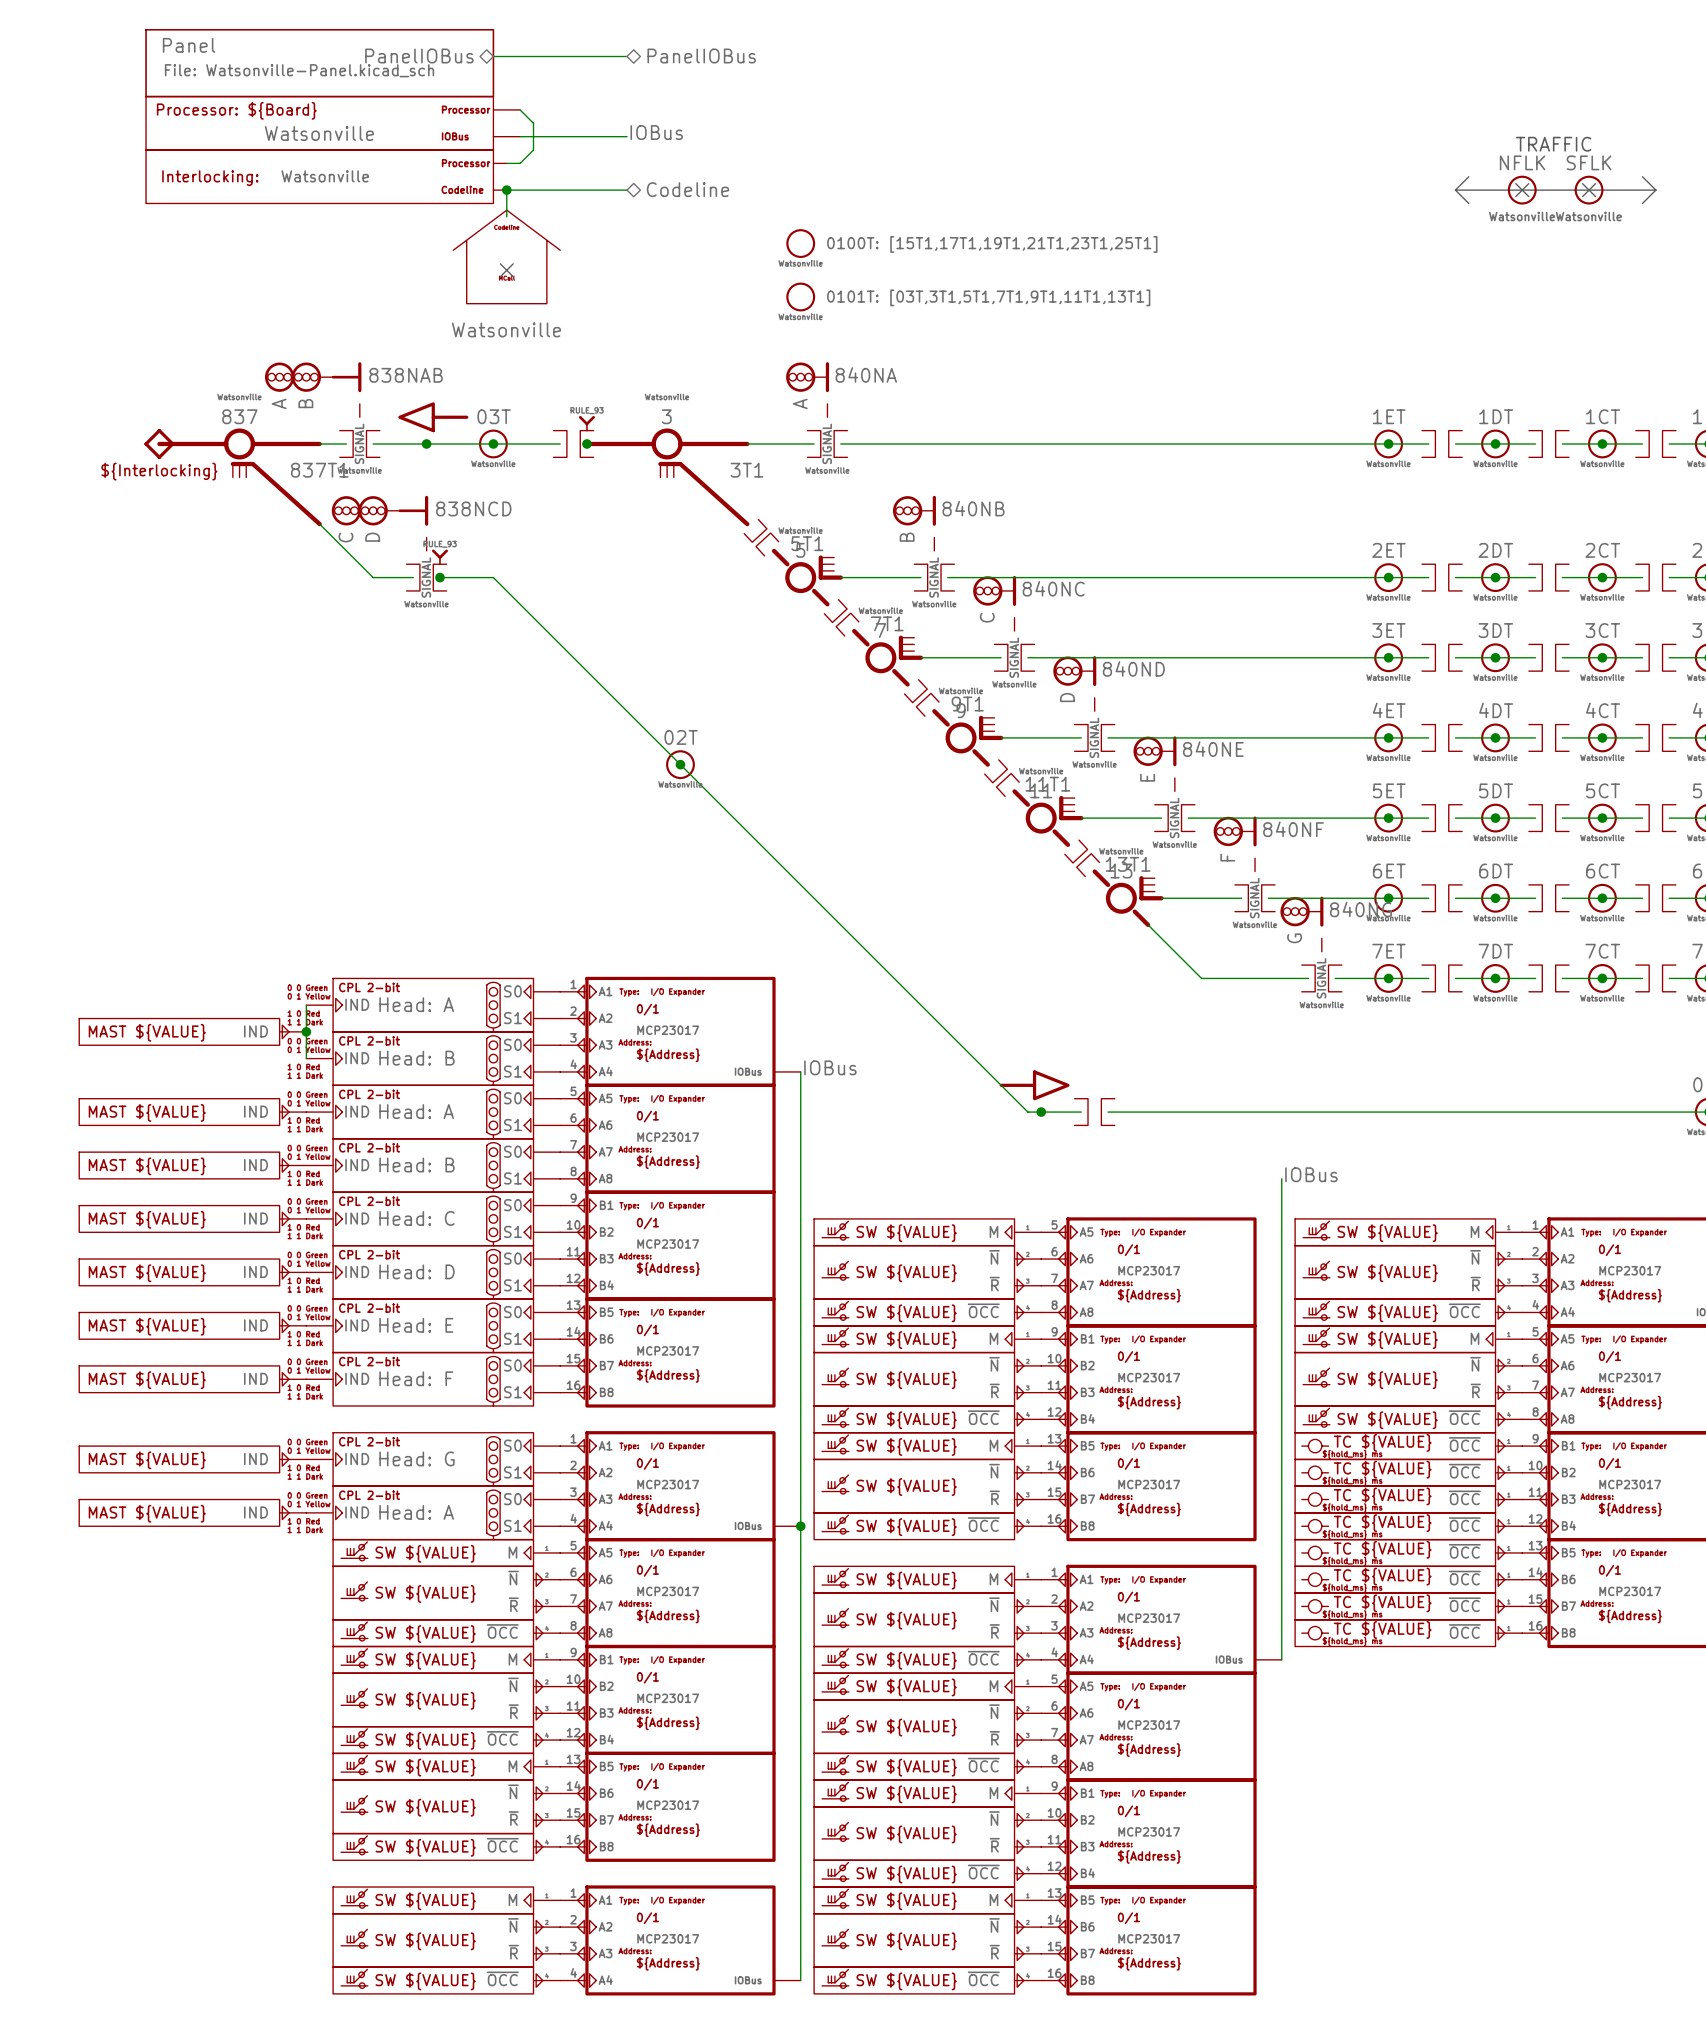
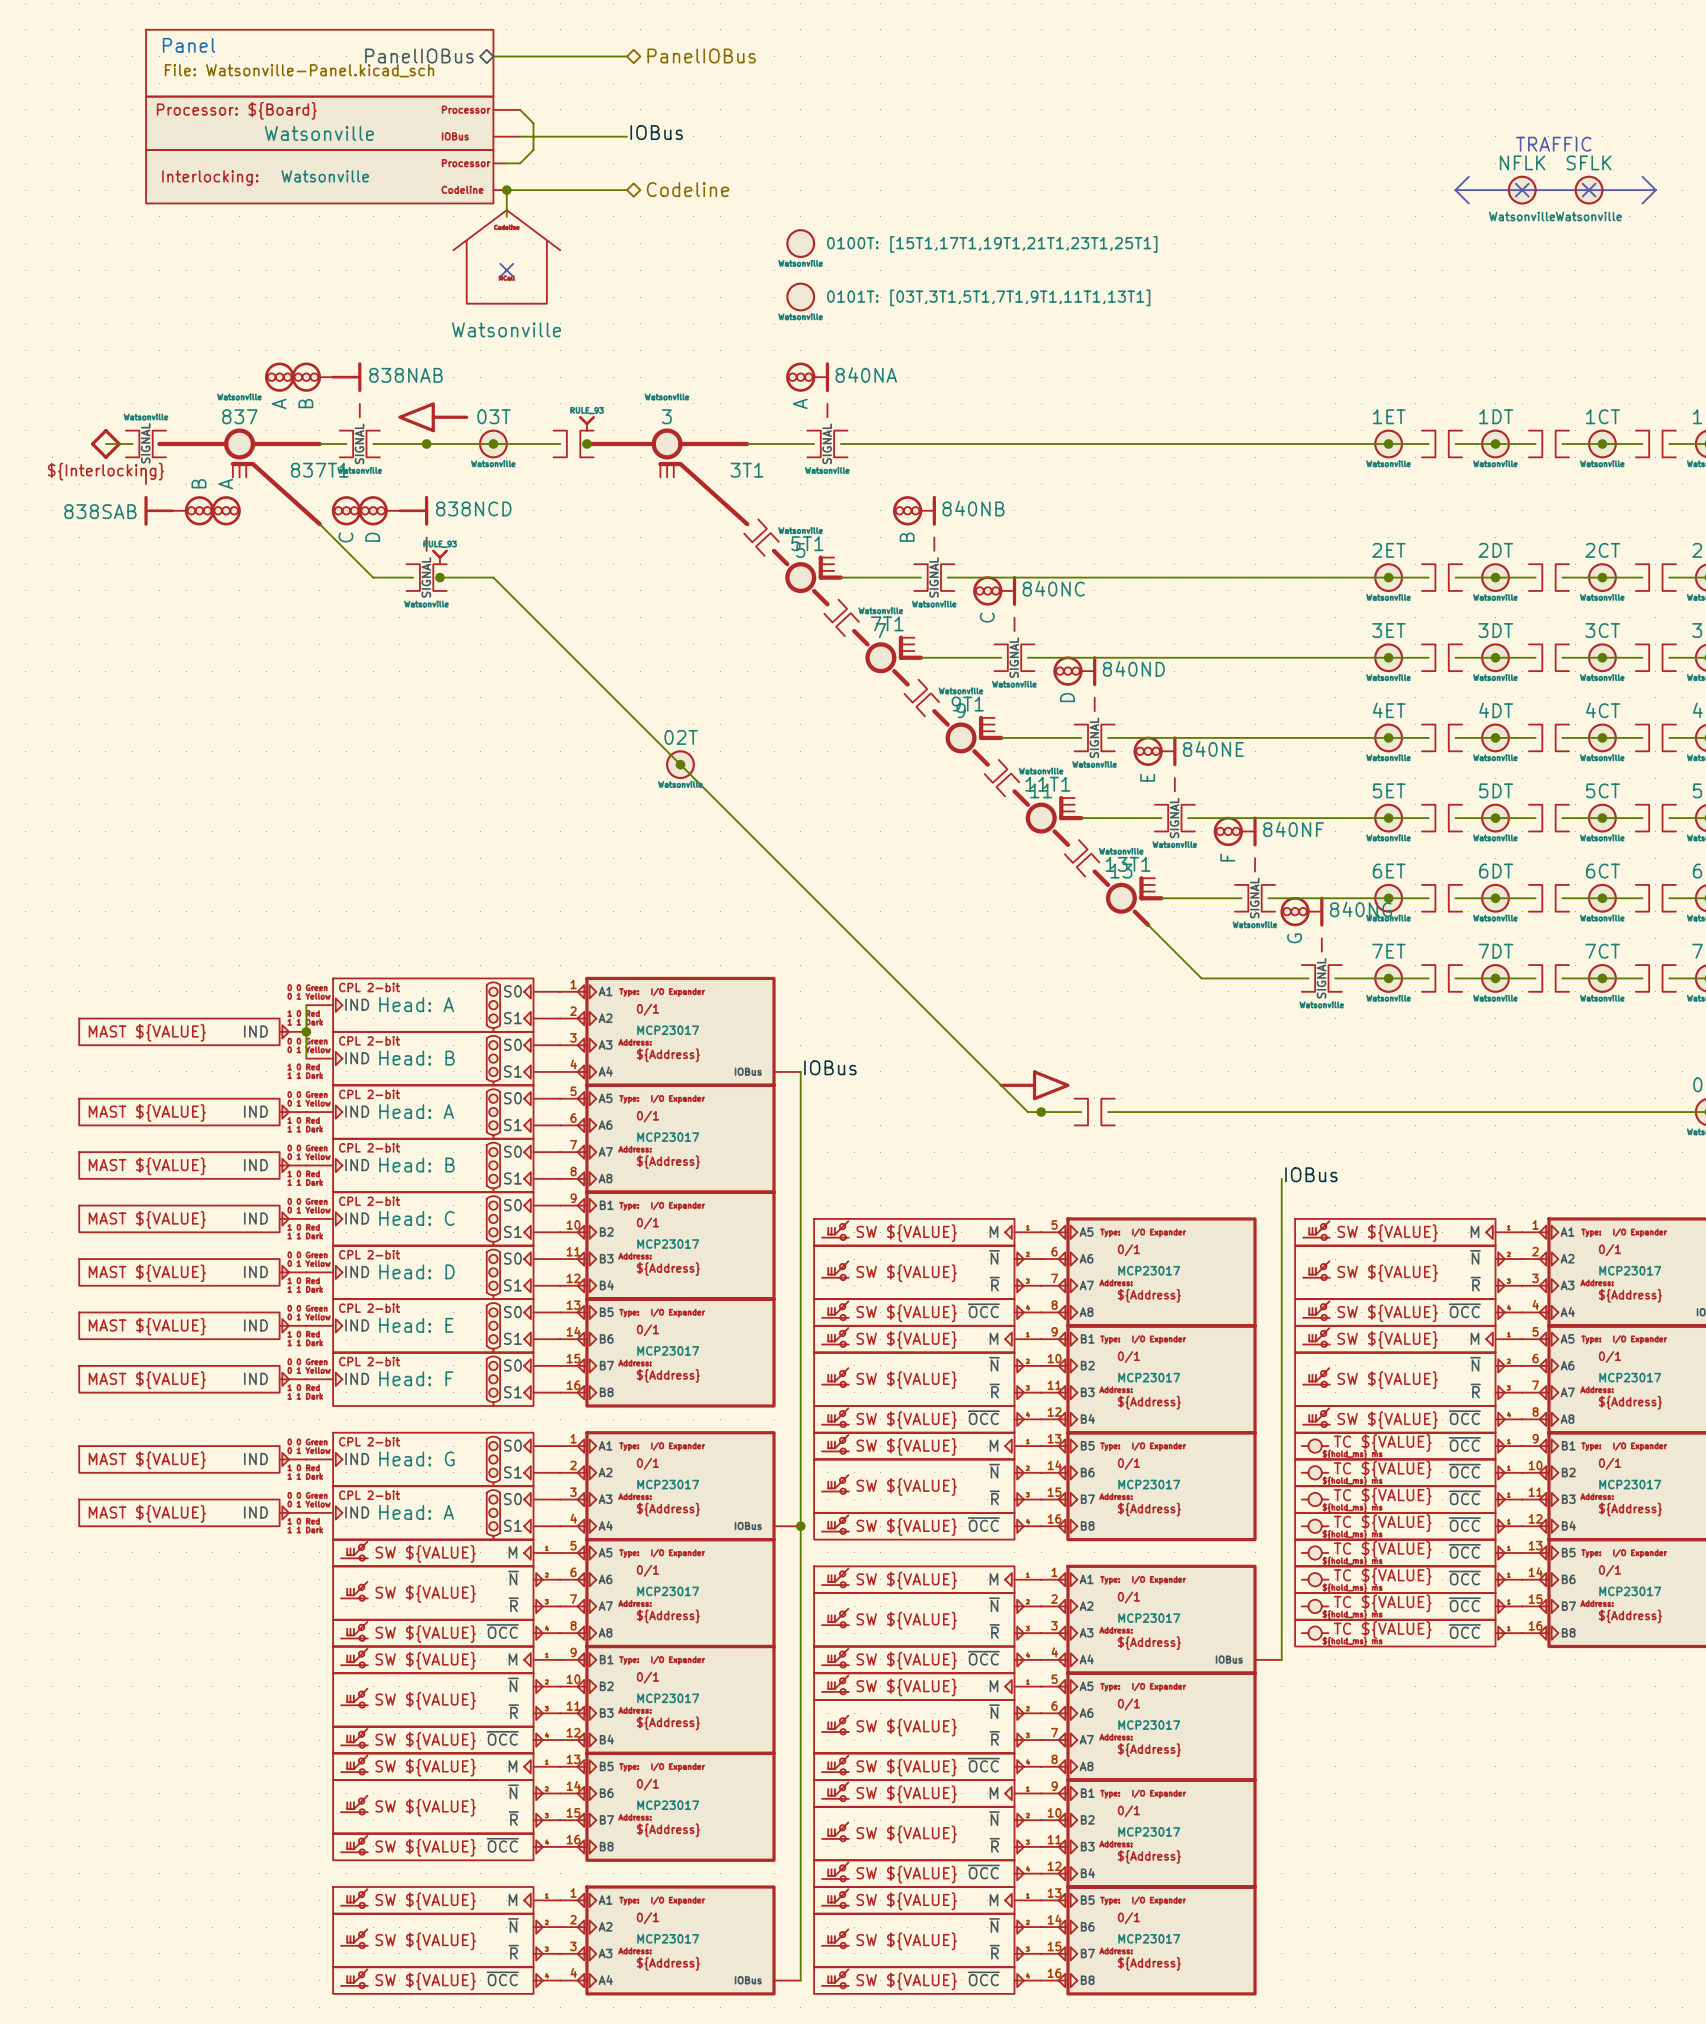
wire: none -> (105, 443) (132, 443)
part position: (159, 443) -> (105, 443)
part: none -> (146, 457)
part: none -> 838SAB (165, 510)
part: none -> B (199, 510)
part: none -> A (226, 510)

